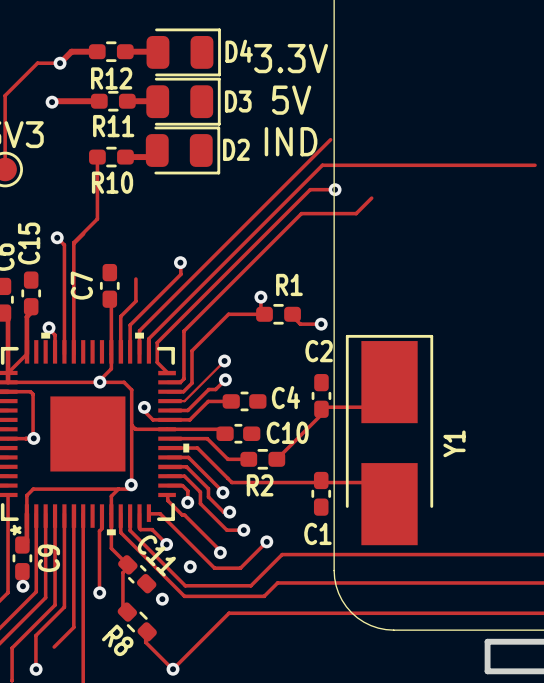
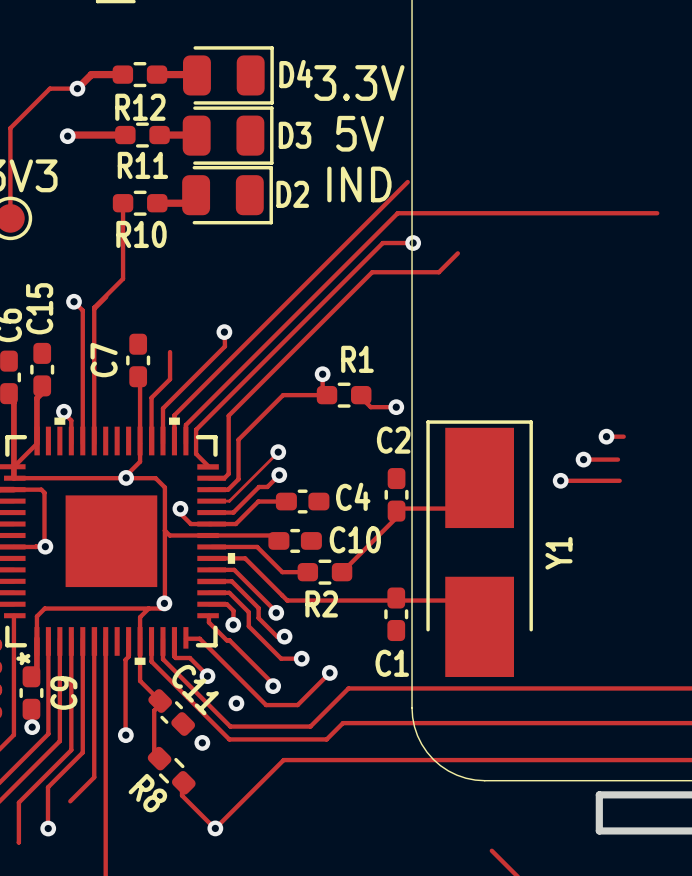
track: none -> (606, 436) (623, 436)
via: none -> (606, 436)
track: none -> (583, 459) (617, 459)
via: none -> (583, 459)
track: none -> (560, 480) (619, 480)
via: none -> (560, 480)

